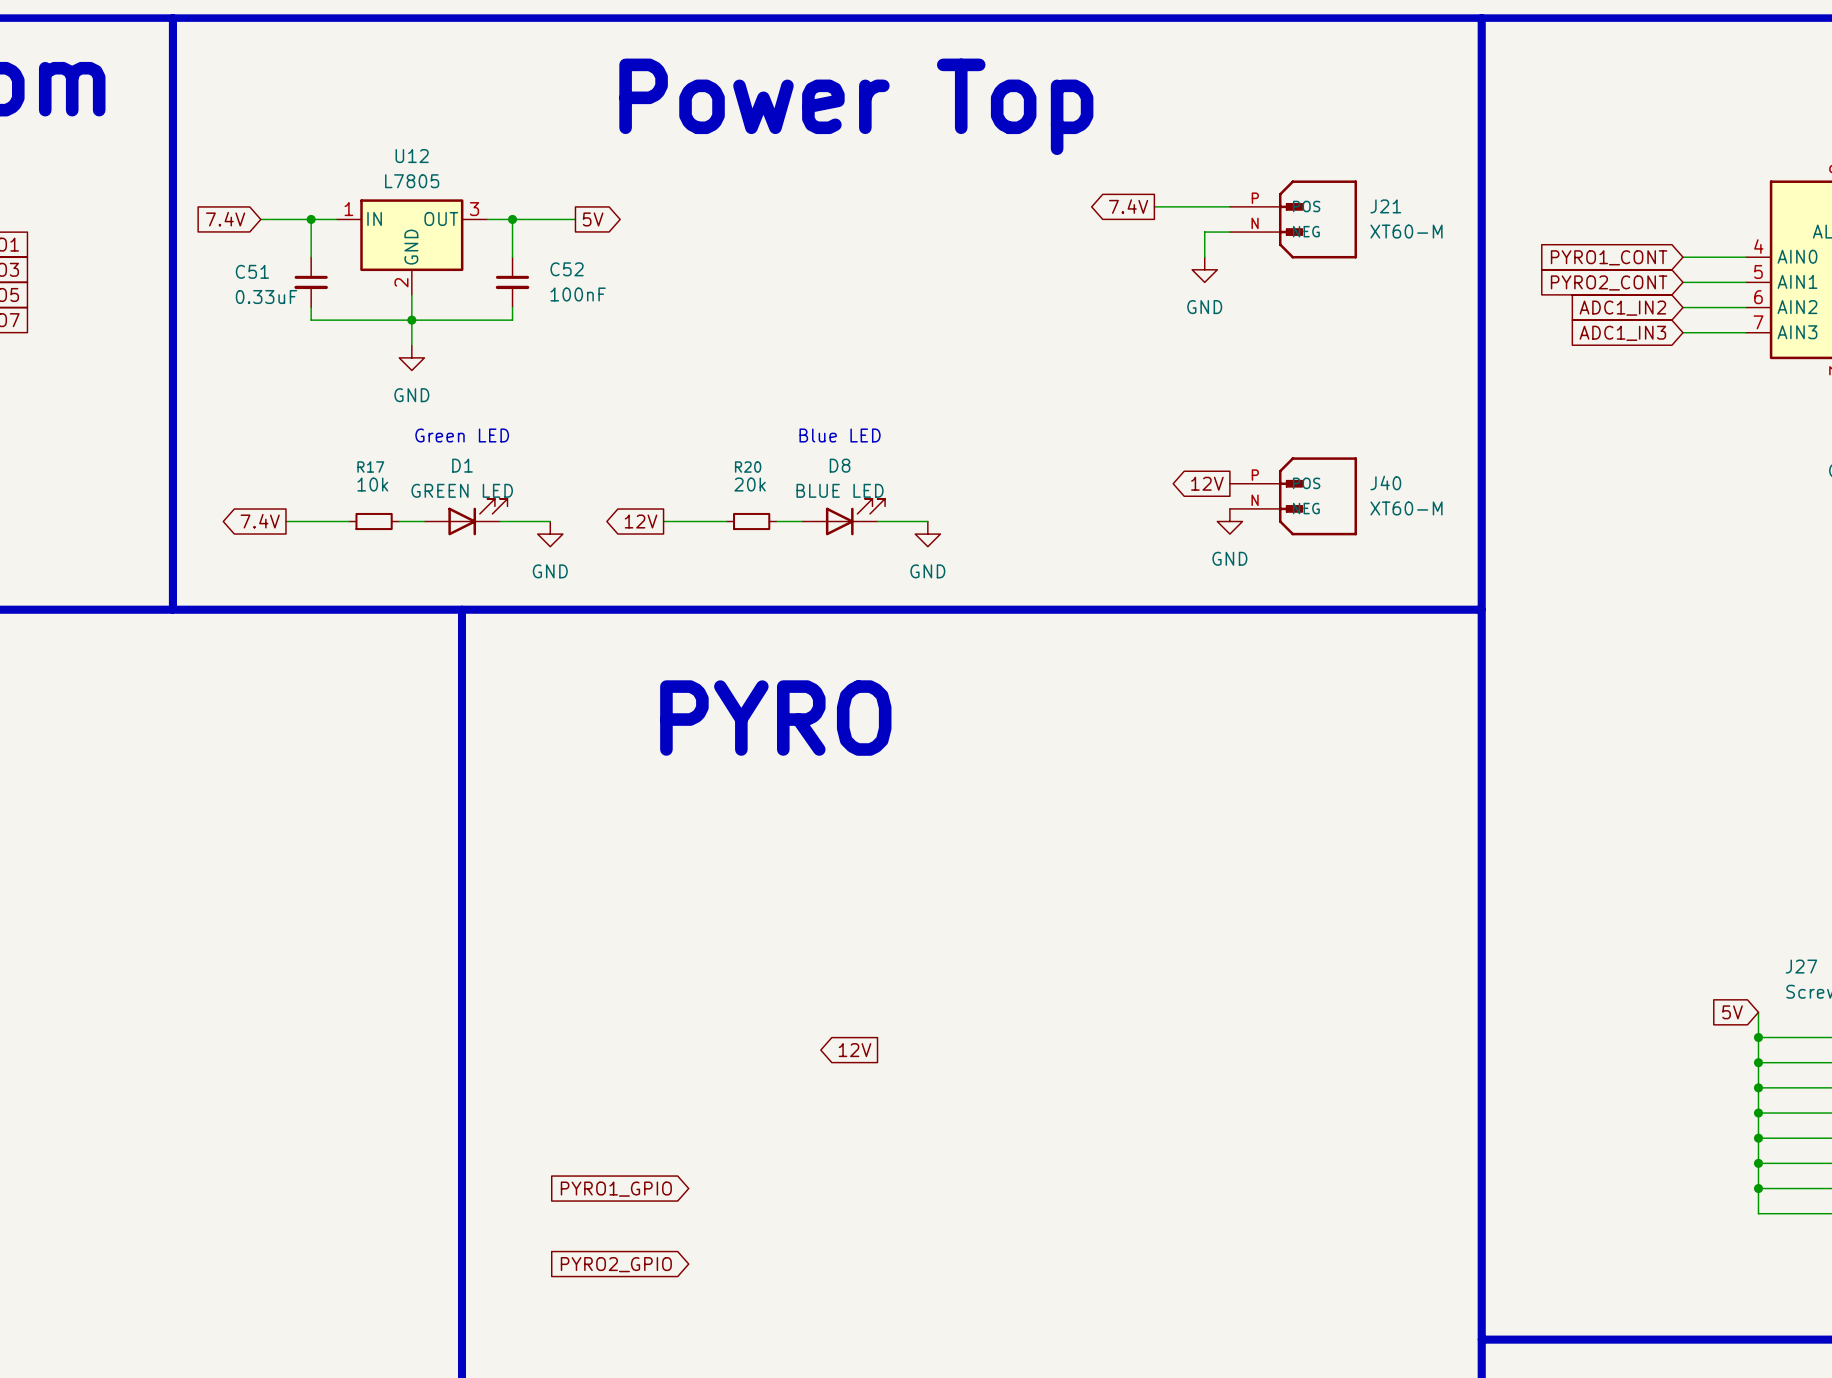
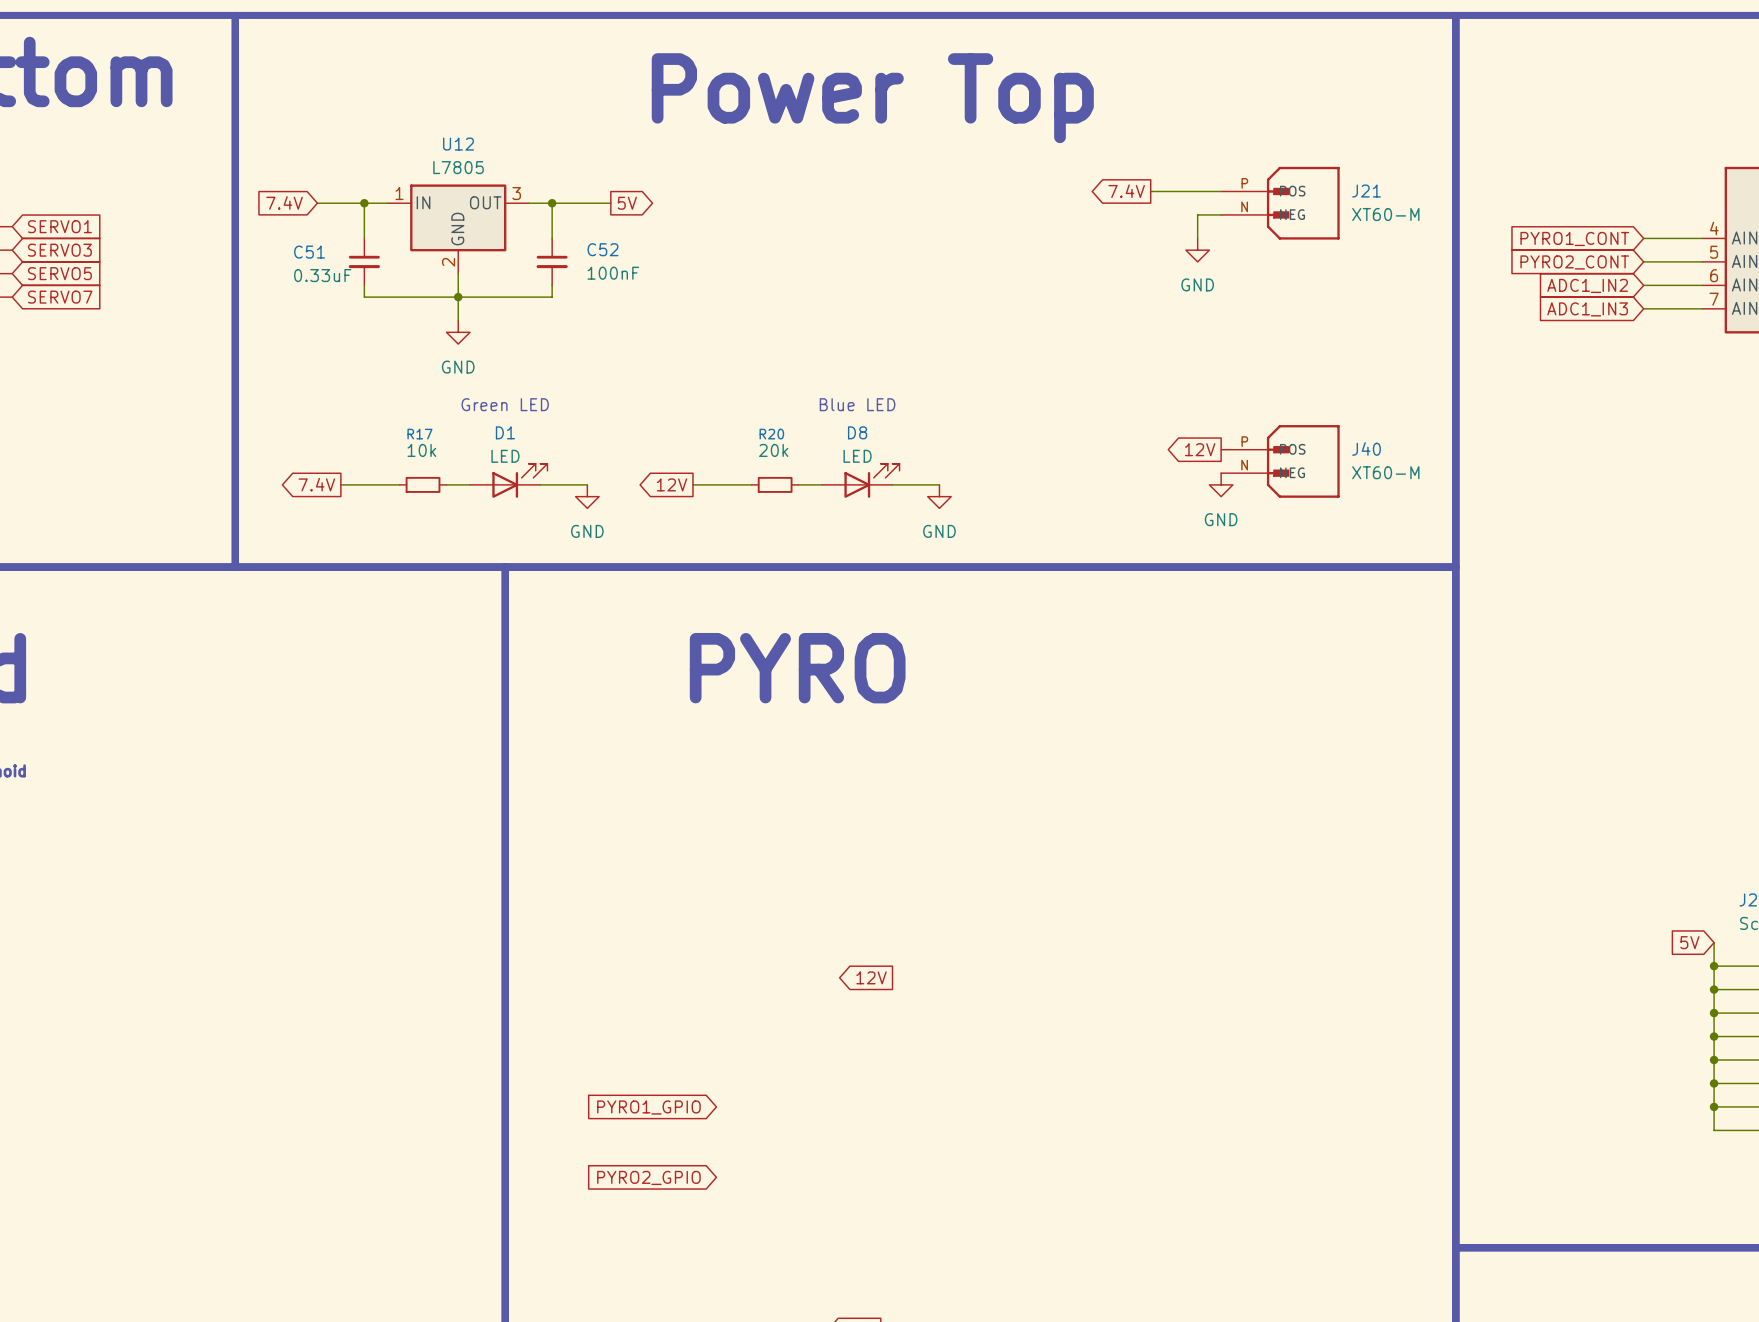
D1 value: GREEN LED (462, 490) -> LED (505, 456)
D8 value: BLUE LED (840, 490) -> LED (857, 456)

